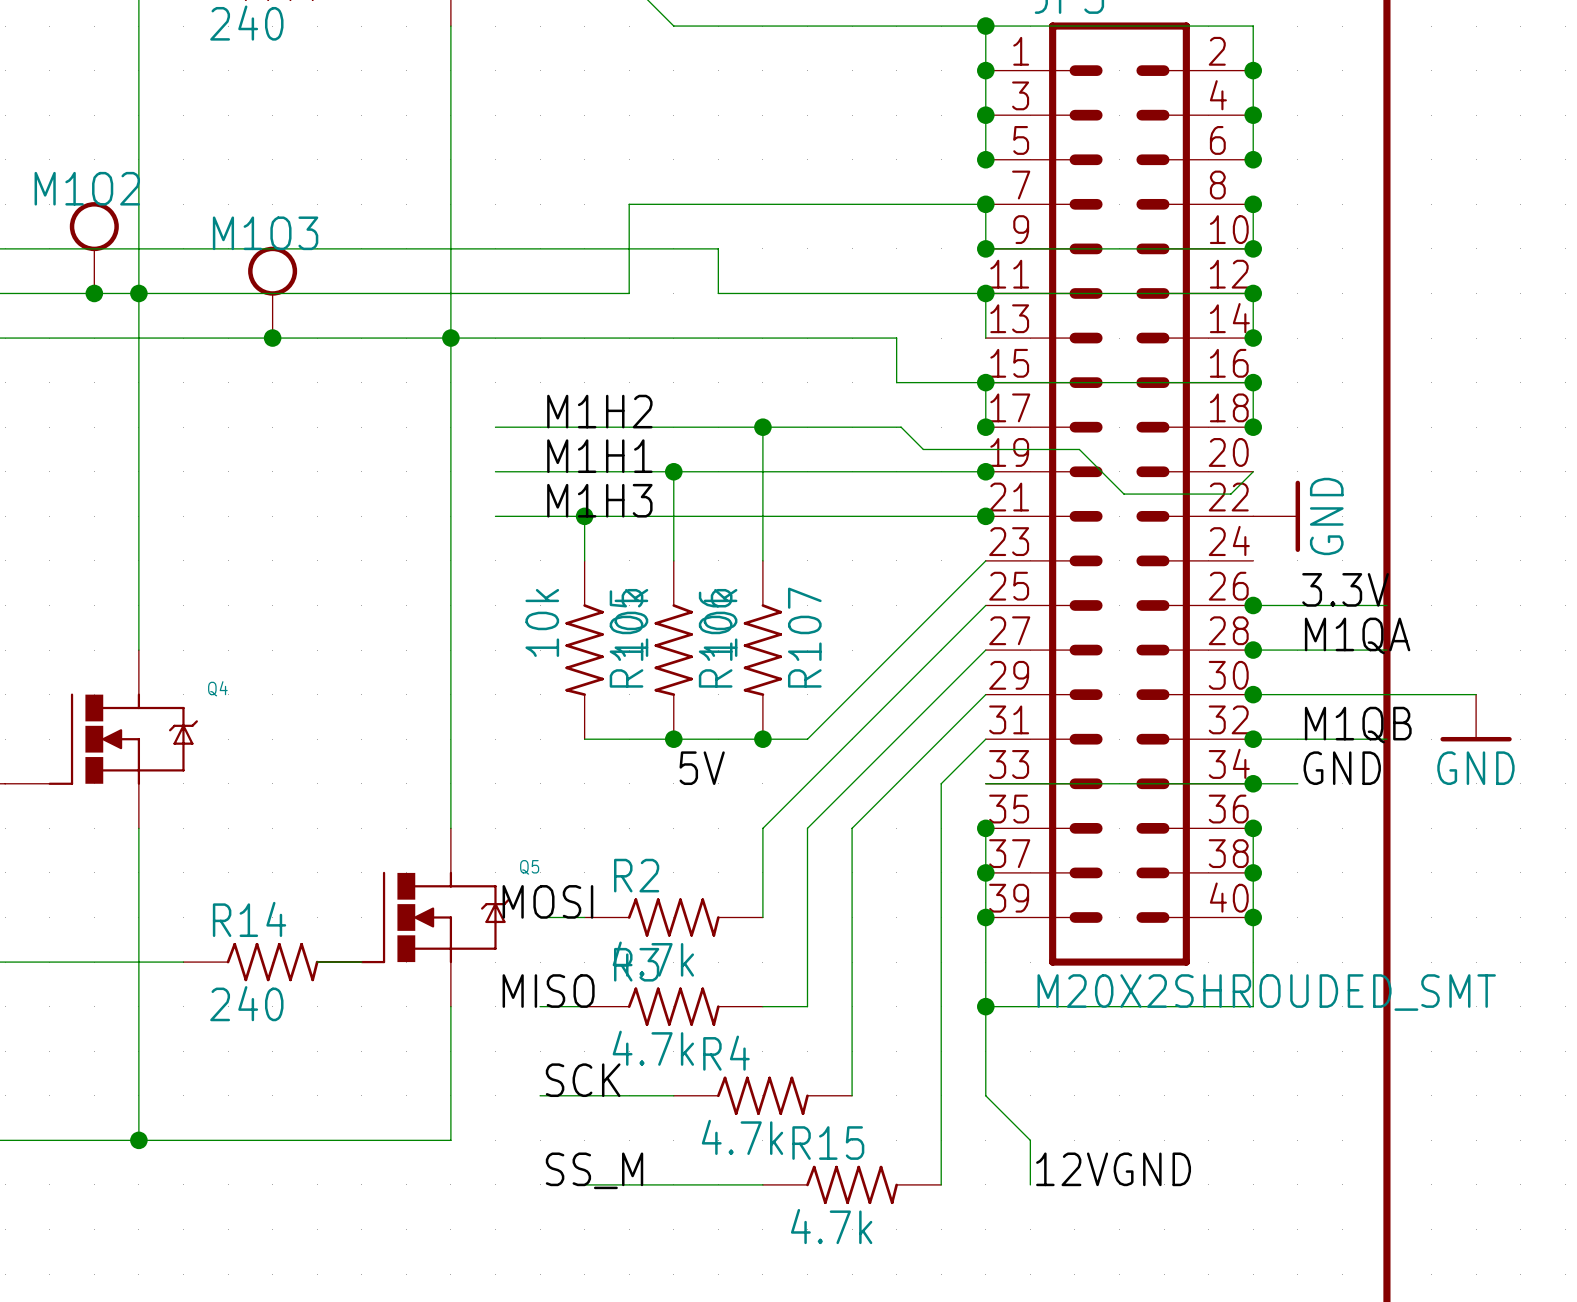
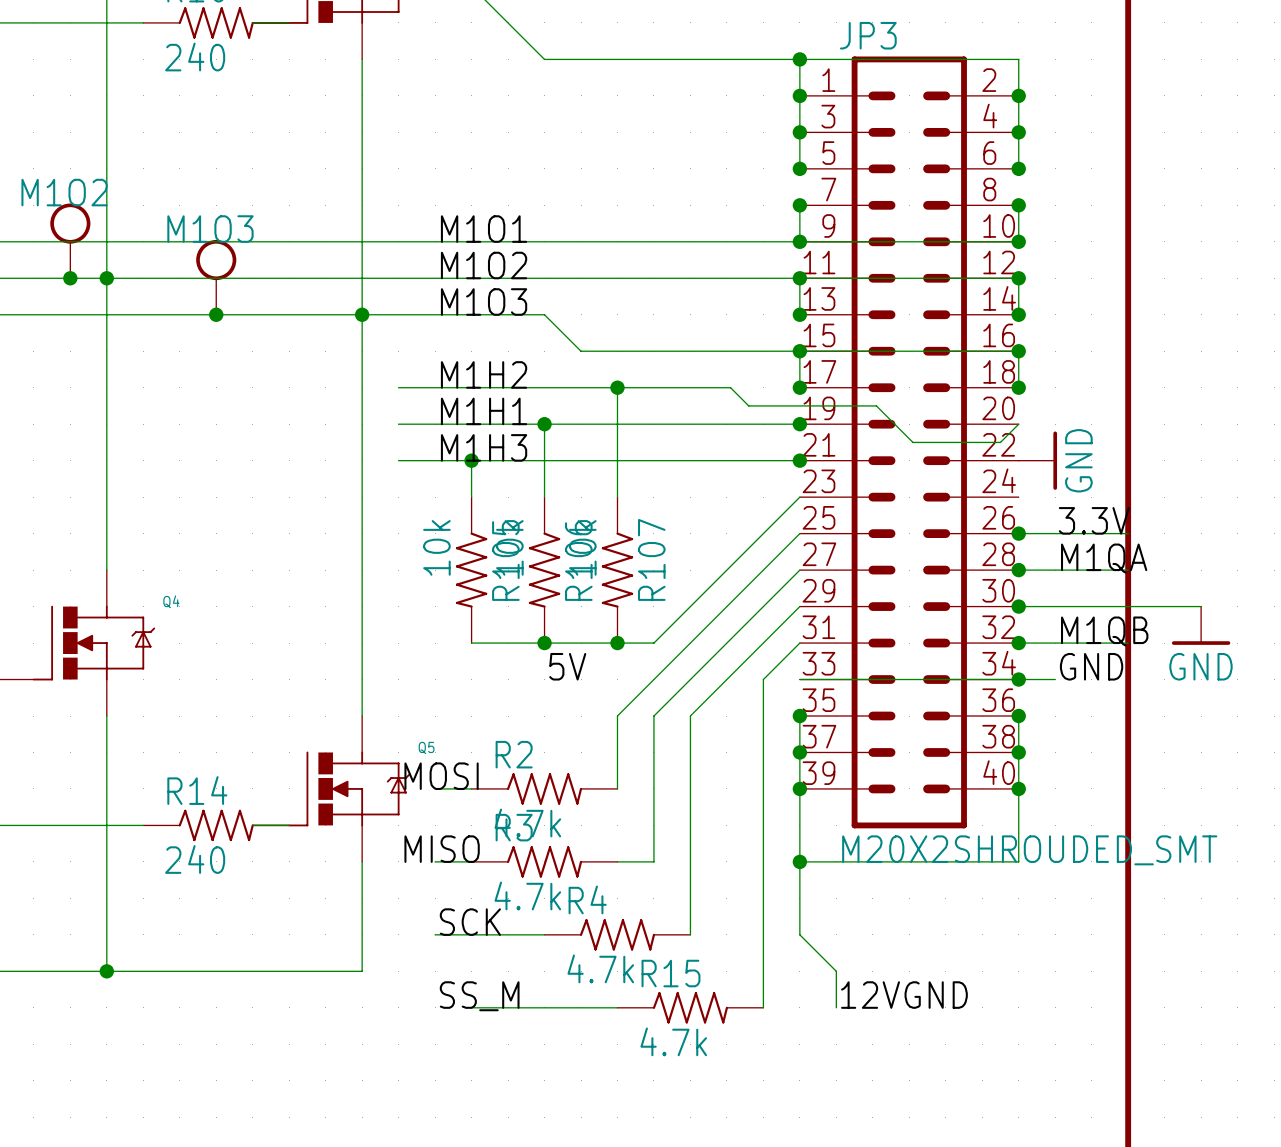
wire: (985, 204) (629, 204) (629, 293) -> none
label: none -> M1O1 (484, 229)
wire: (718, 248) (718, 293) -> (508, 278) (581, 278)
wire: none -> (581, 241) (799, 241)
label: none -> M1O2 (484, 265)
label: none -> M1O3 (484, 301)
wire: (673, 338) (896, 338) (896, 382) -> (544, 314) (581, 351) (726, 351)
junction: none -> (799, 314)

